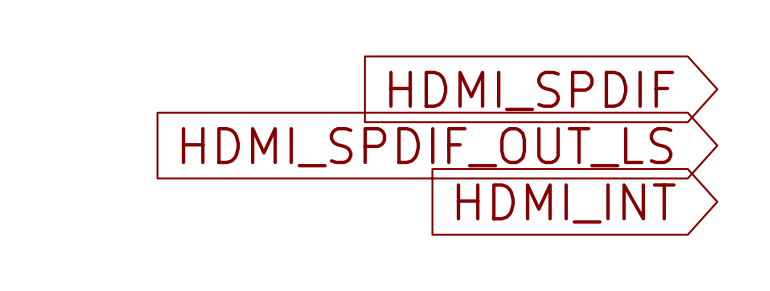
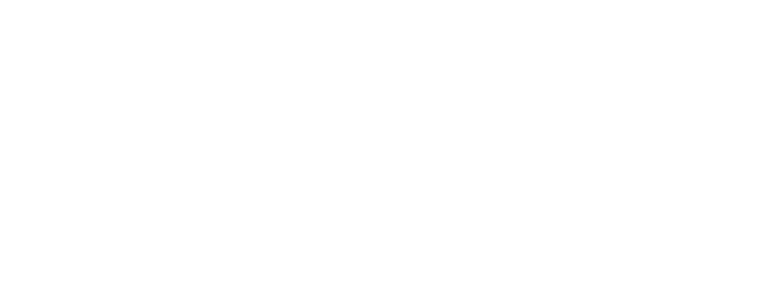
global label: HDMI_SPDIF (531, 90) -> none
global label: HDMI_SPDIF_OUT_LS (427, 147) -> none
global label: HDMI_INT (566, 203) -> none

